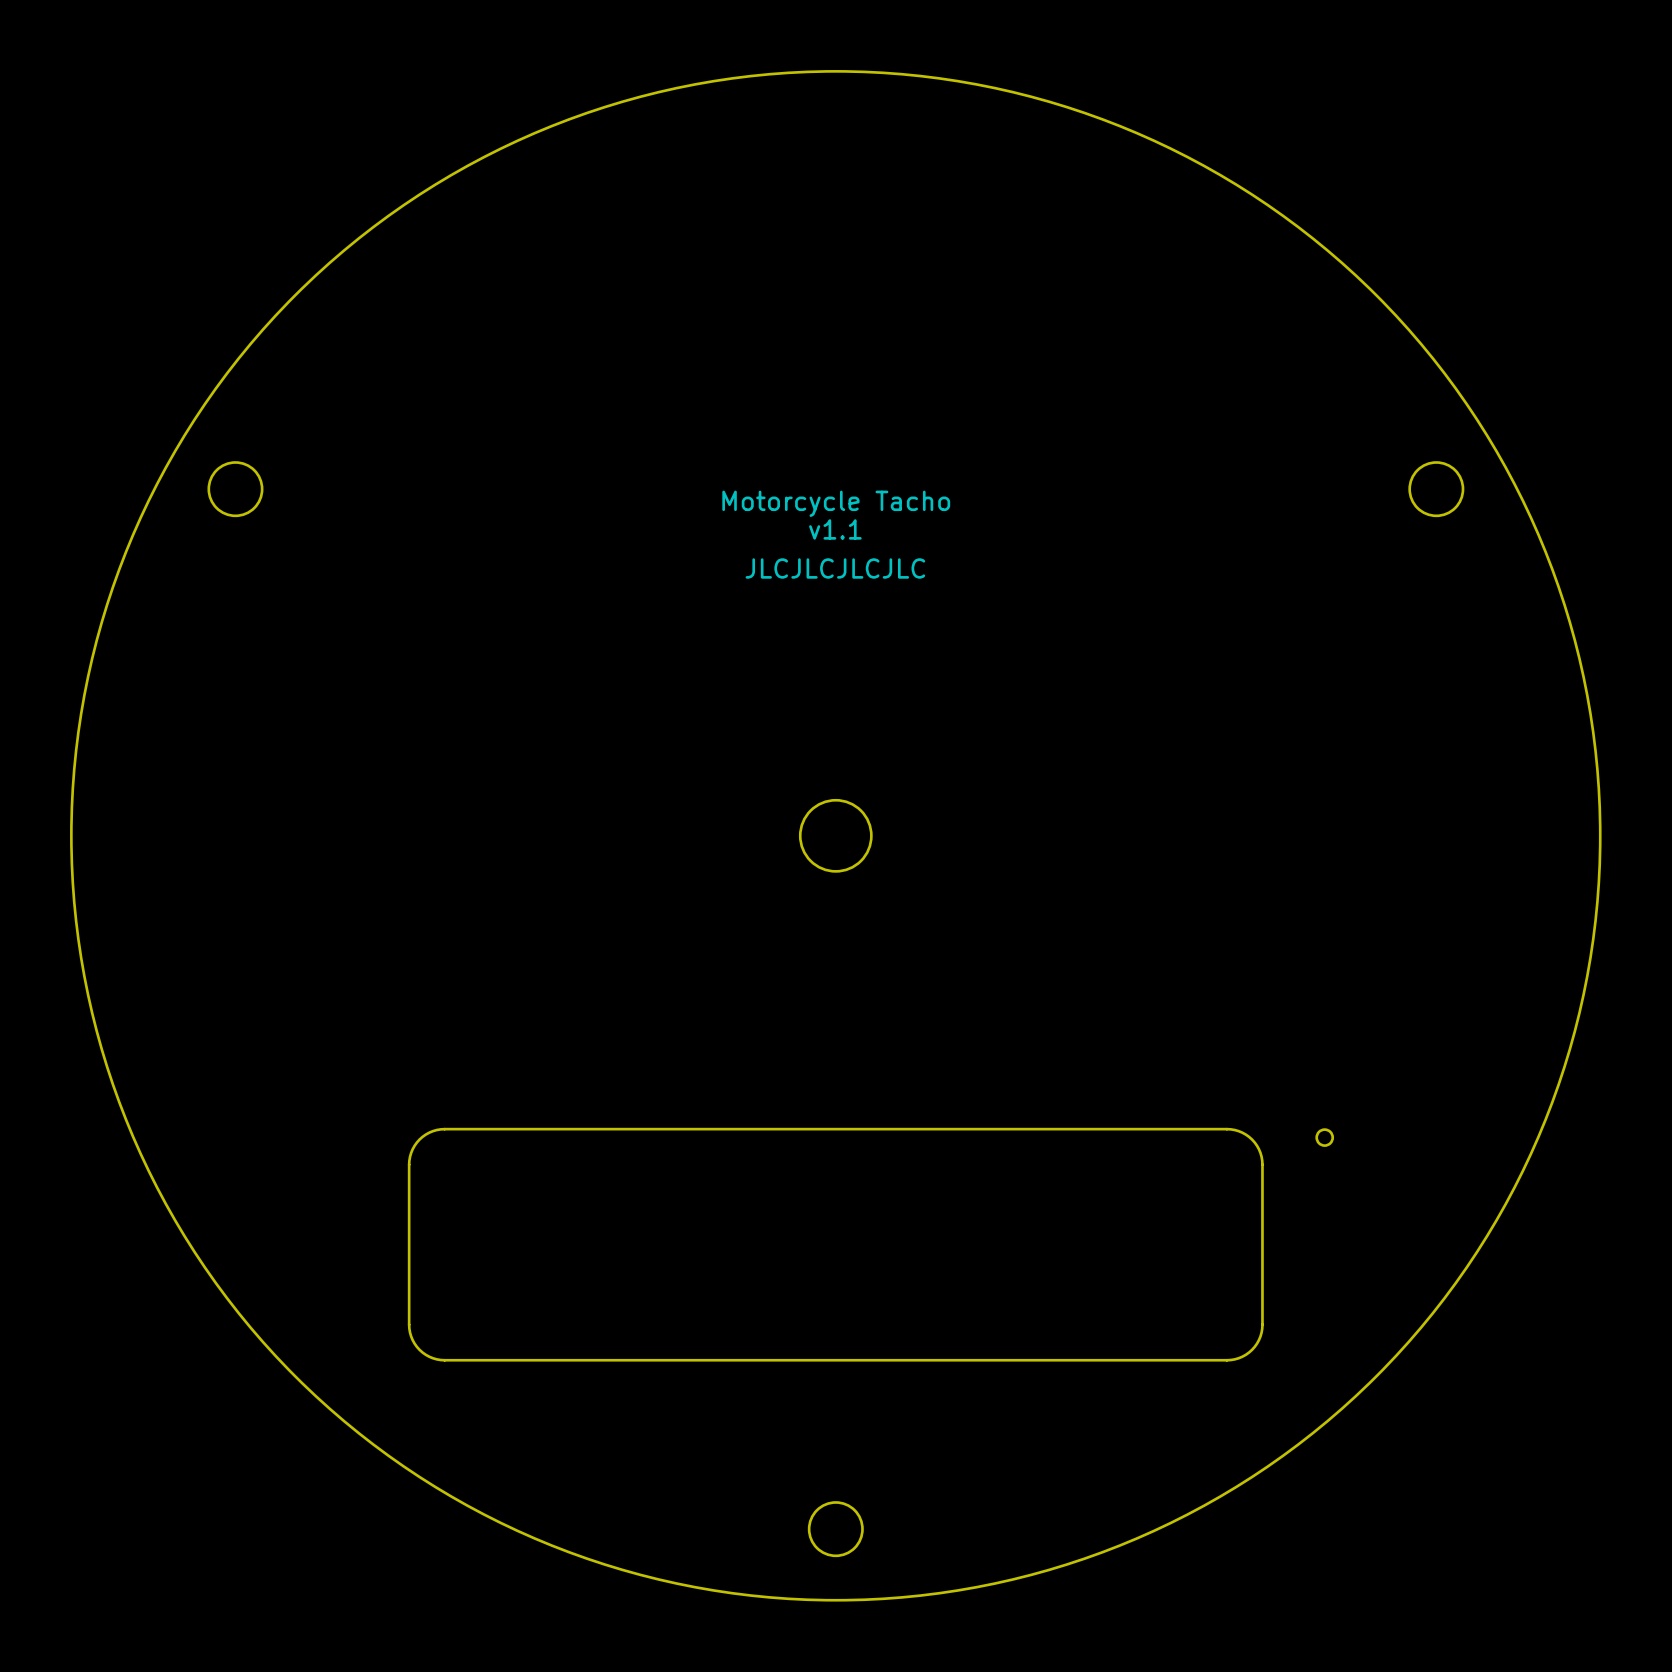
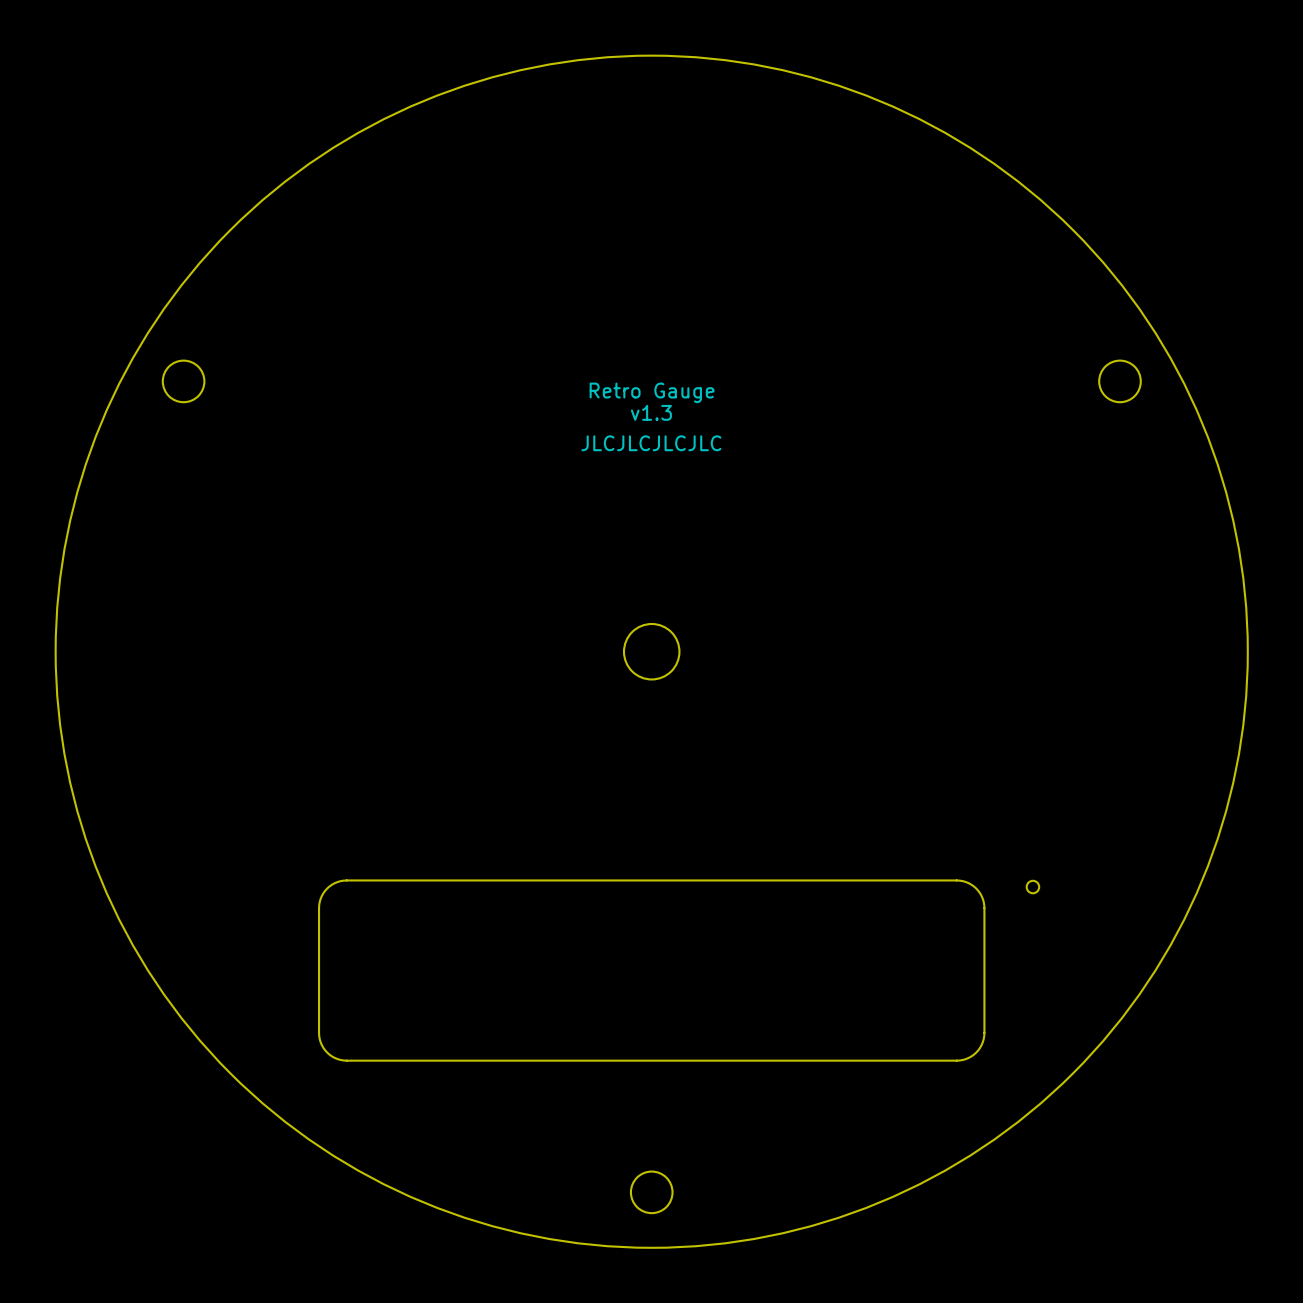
text: Motorcycle Tacho (836, 503) -> Retro Gauge (652, 392)
text: v1.1 (835, 529) -> v1.3 (651, 412)

